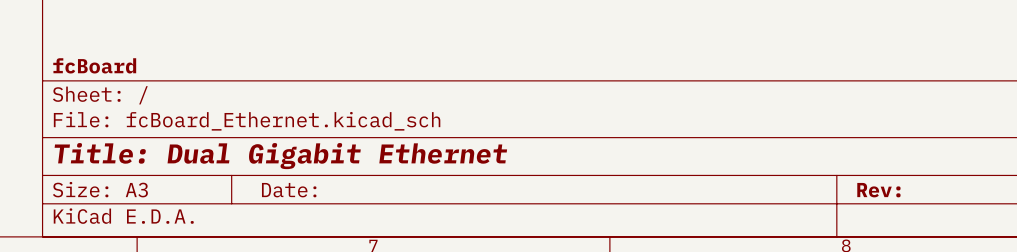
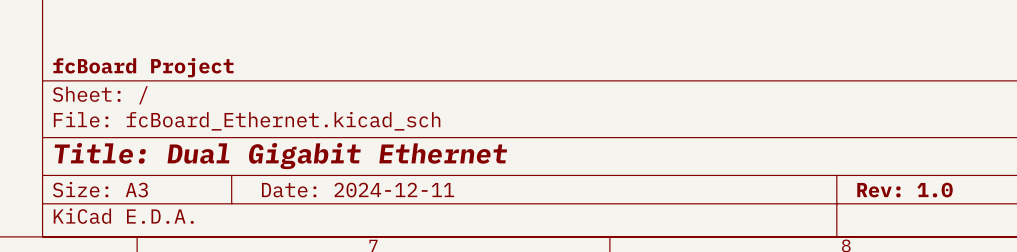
title block: fcBoard (94, 65) -> fcBoard Project (143, 67)
title block: Date: (289, 190) -> Date: 2024-12-11 (358, 190)
title block: Rev: (878, 190) -> Rev: 1.0 (905, 190)

